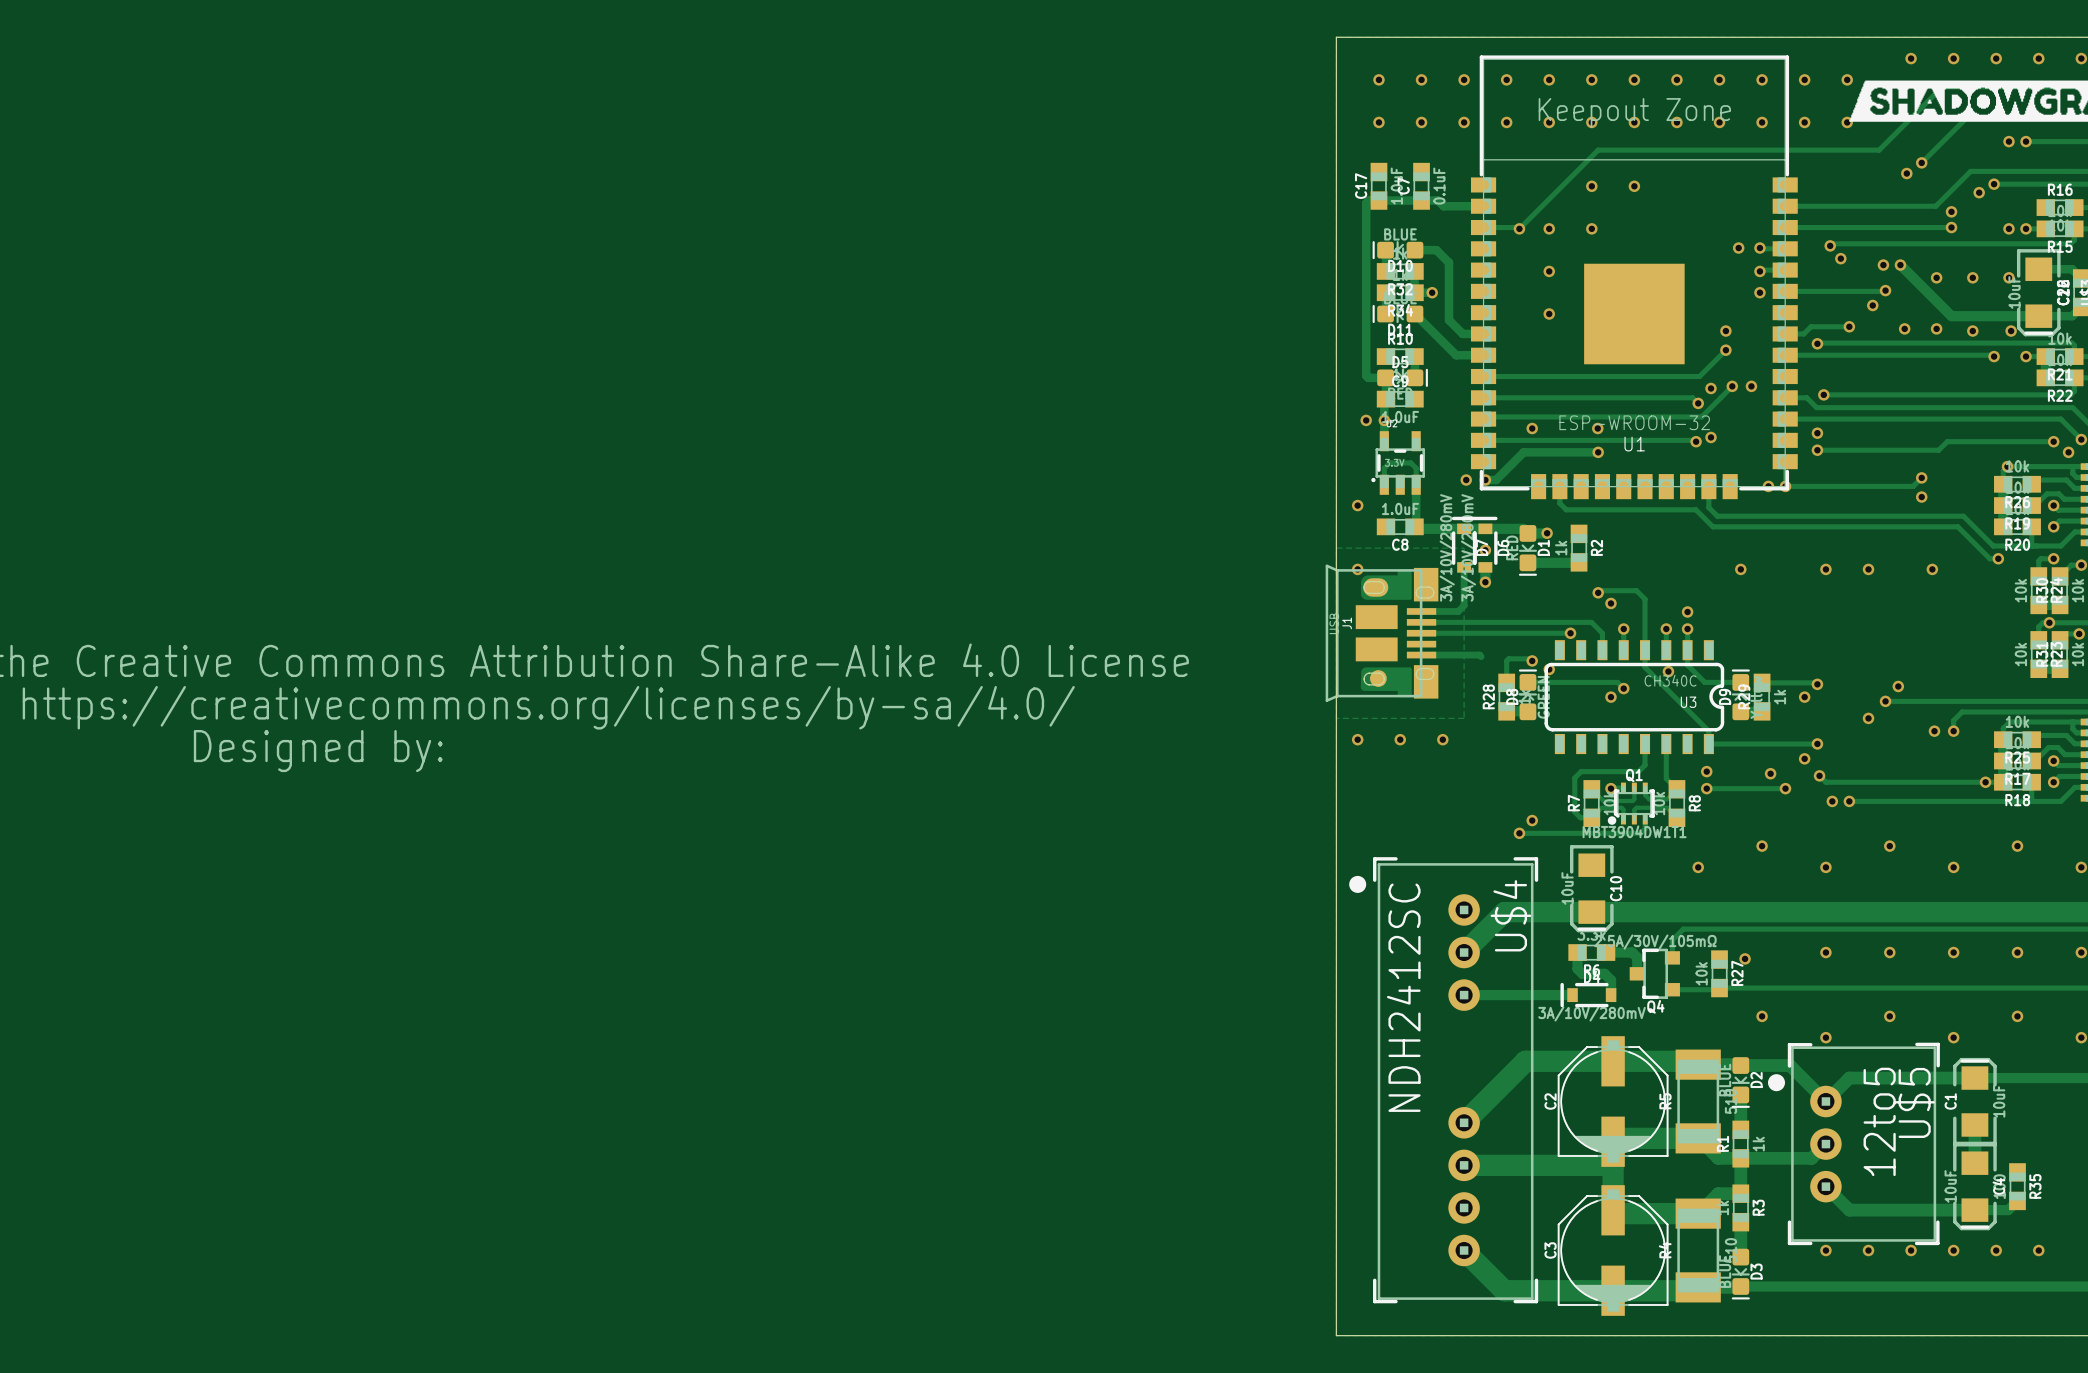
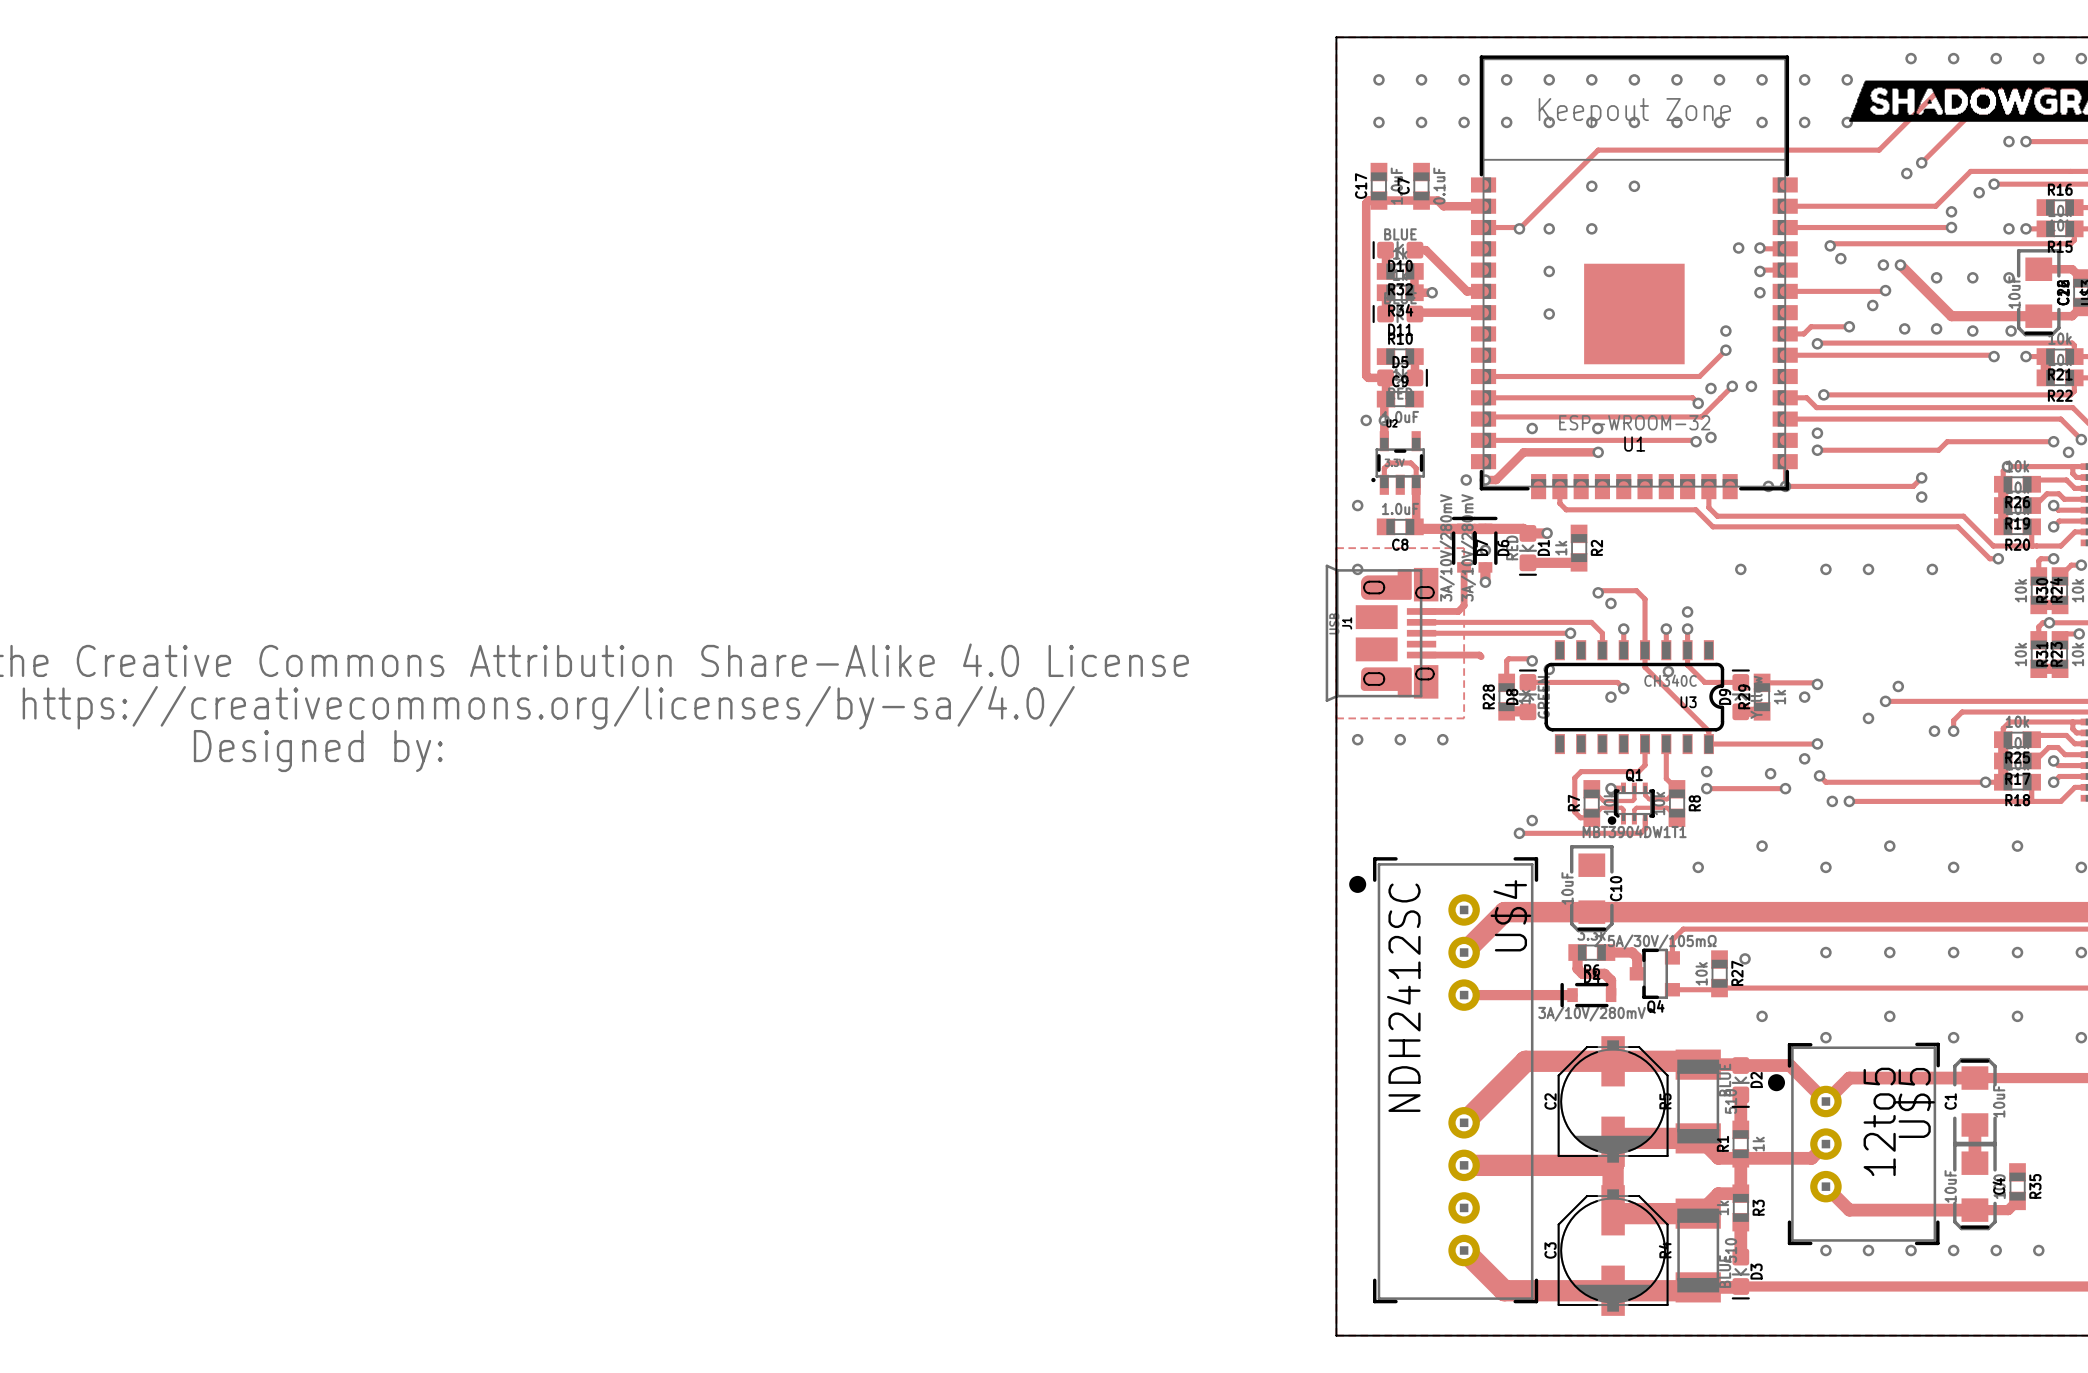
track: (1425, 250) (1436, 250) (1448, 262) (1448, 320) (1462, 333) (1483, 333) -> (1425, 250) (1467, 291) (1483, 291)
track: none -> (1416, 312) (1483, 312)
track: (1414, 314) (1456, 355) (1483, 355) -> none

